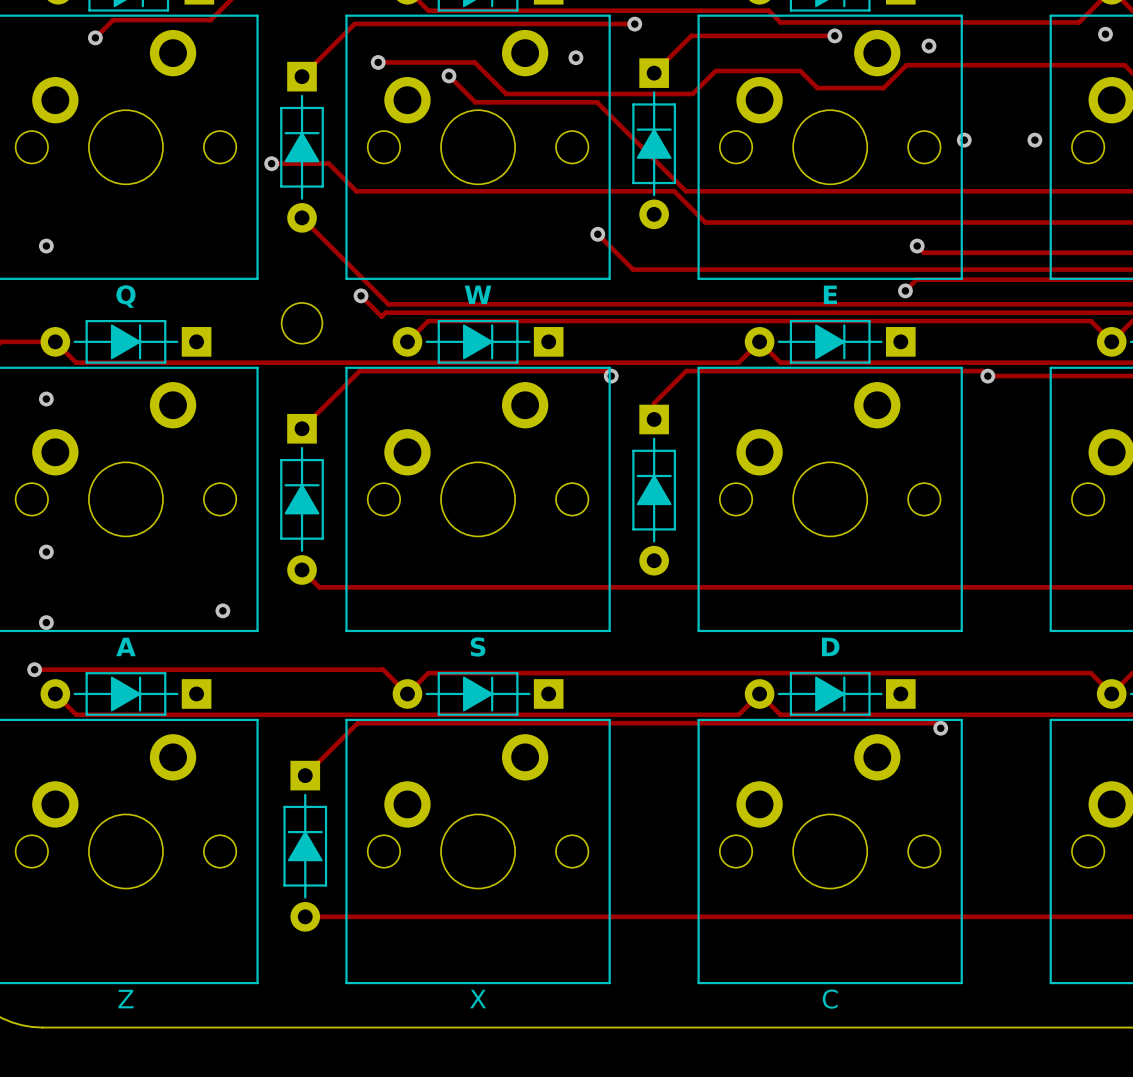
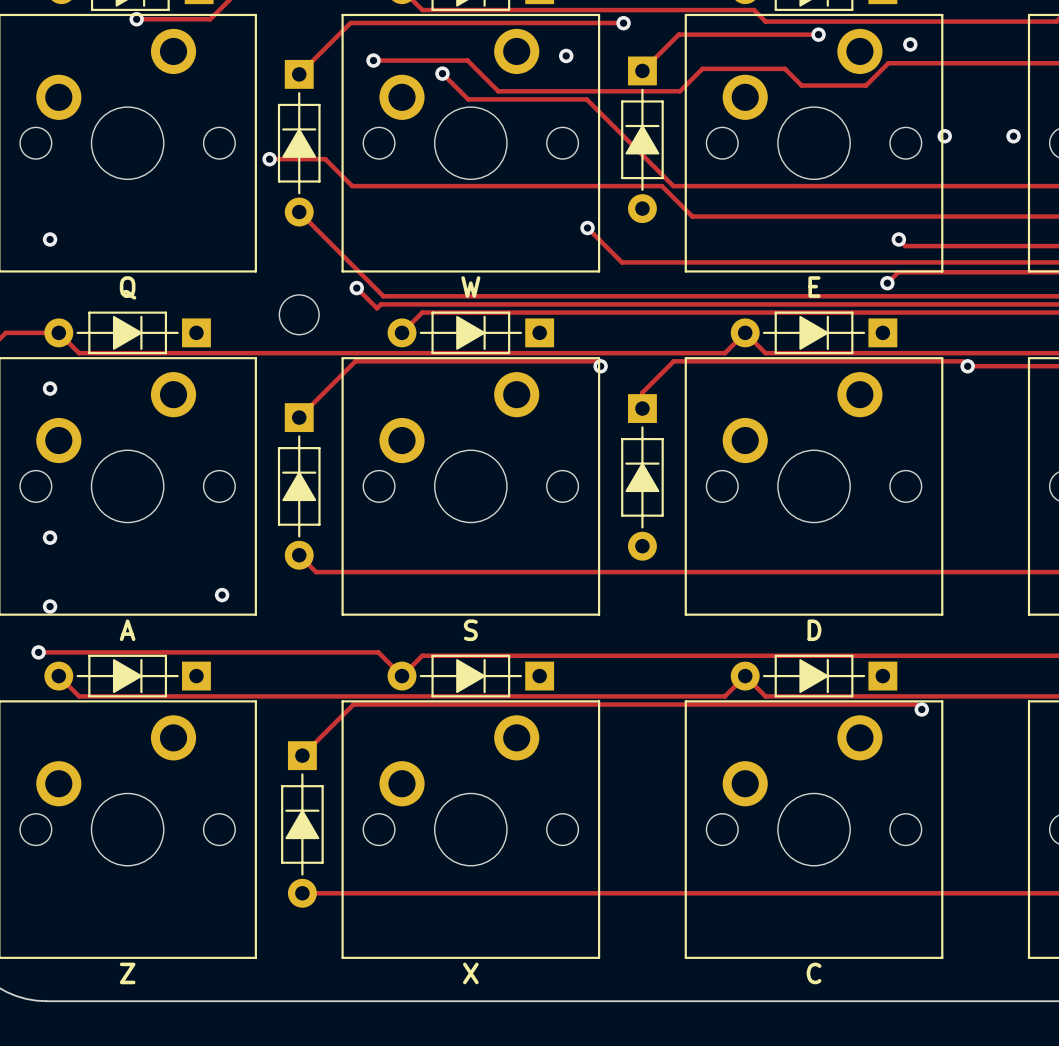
track: (135, 20) (113, 20) (95, 37) -> none
via position: (95, 37) -> (136, 19)

